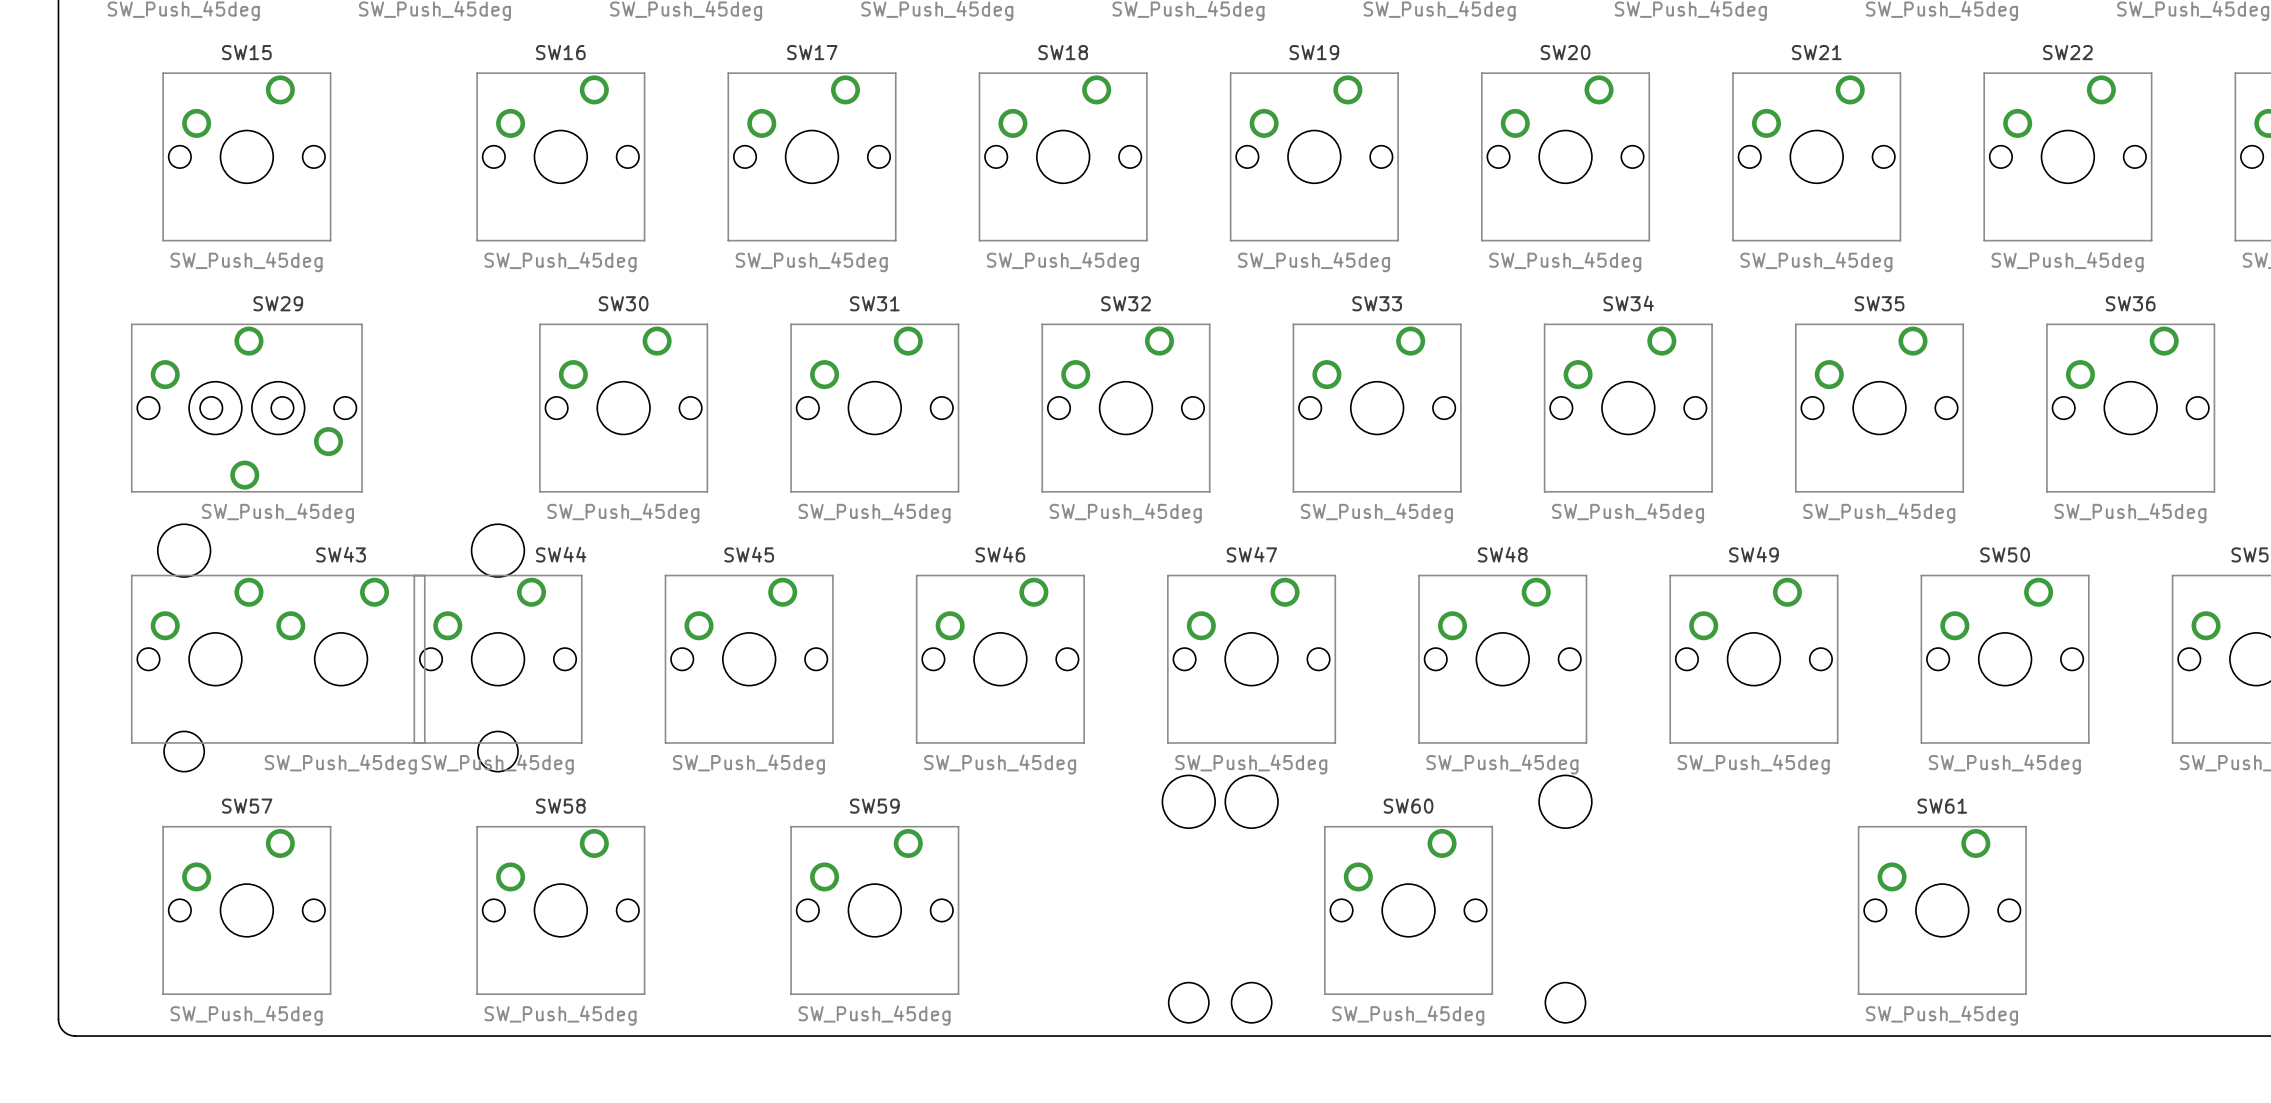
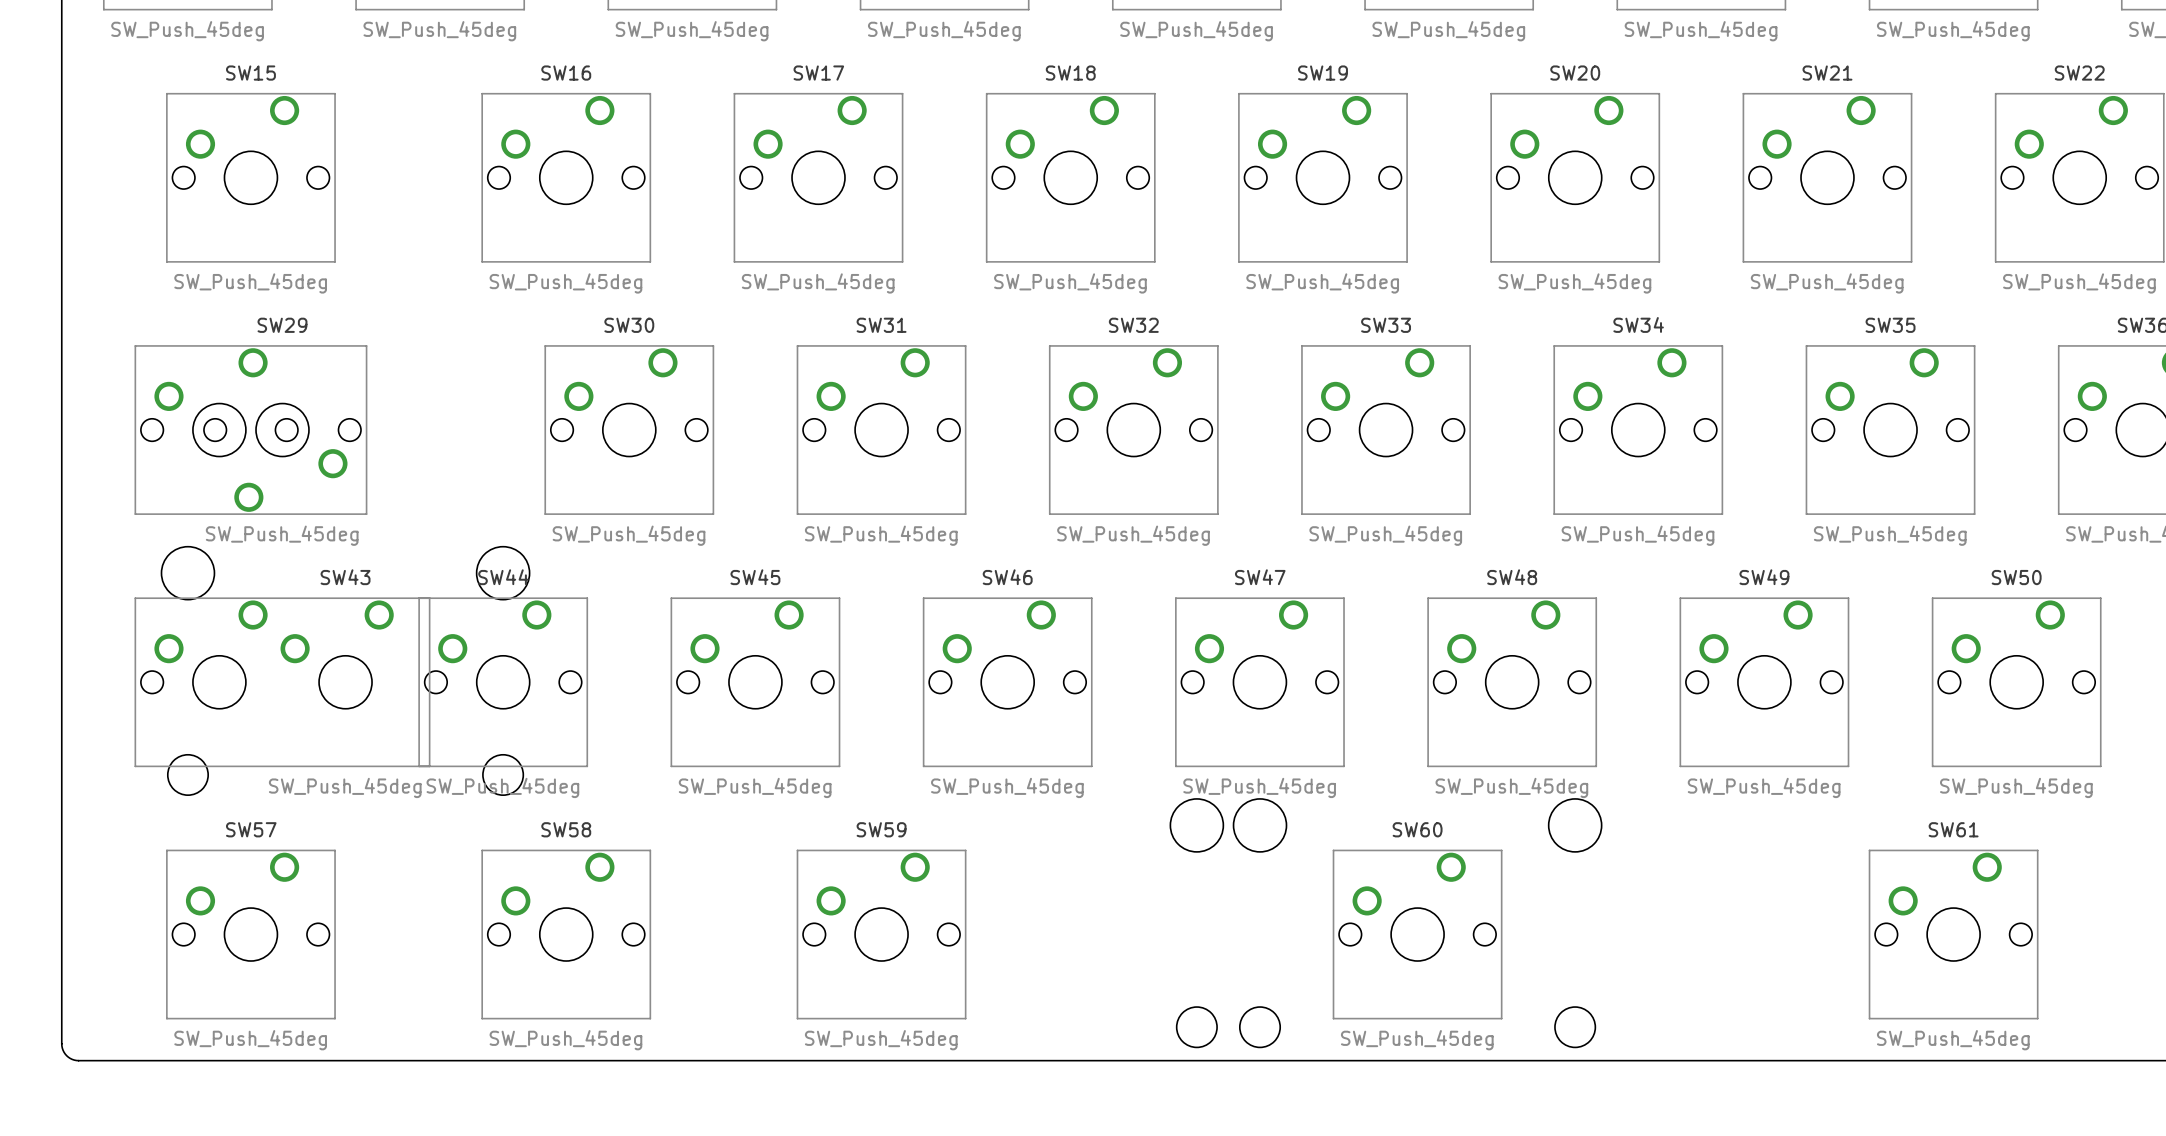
SW44 name position: SW44 (561, 554) -> SW44 (503, 577)

